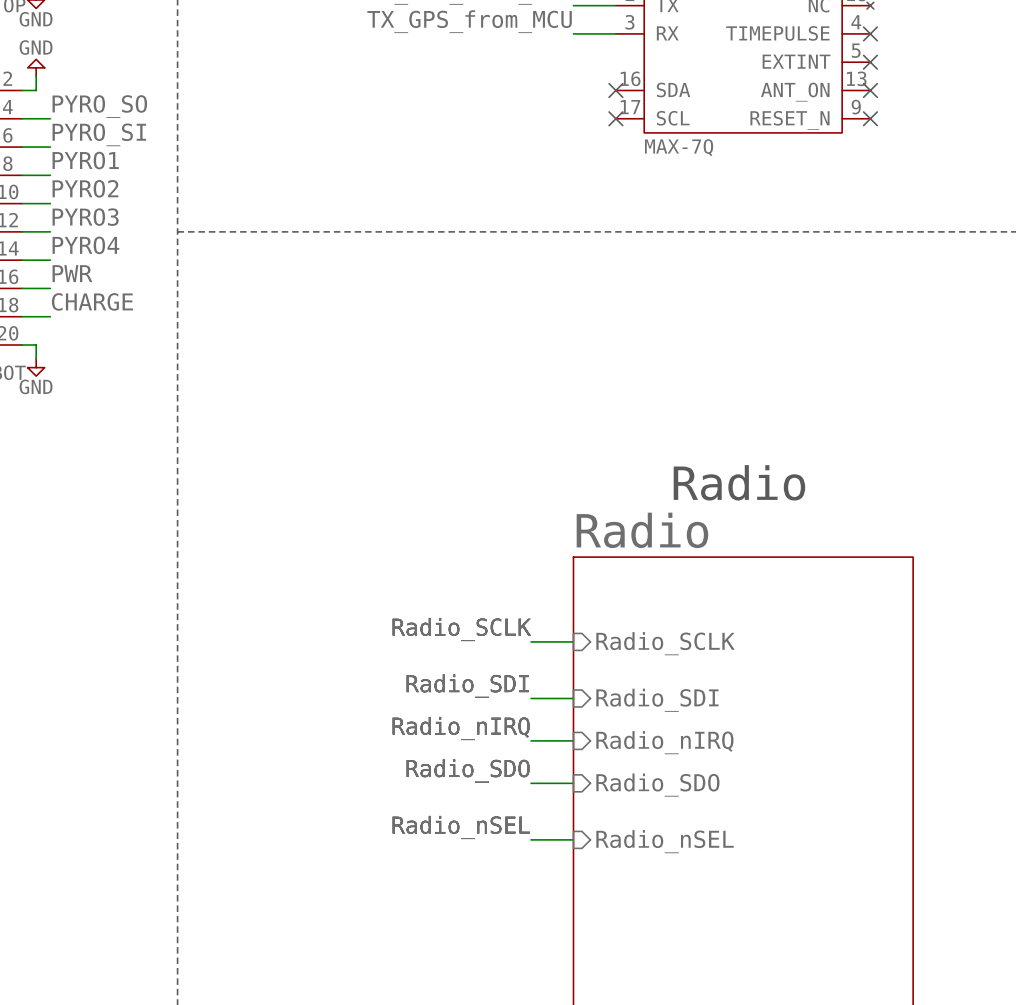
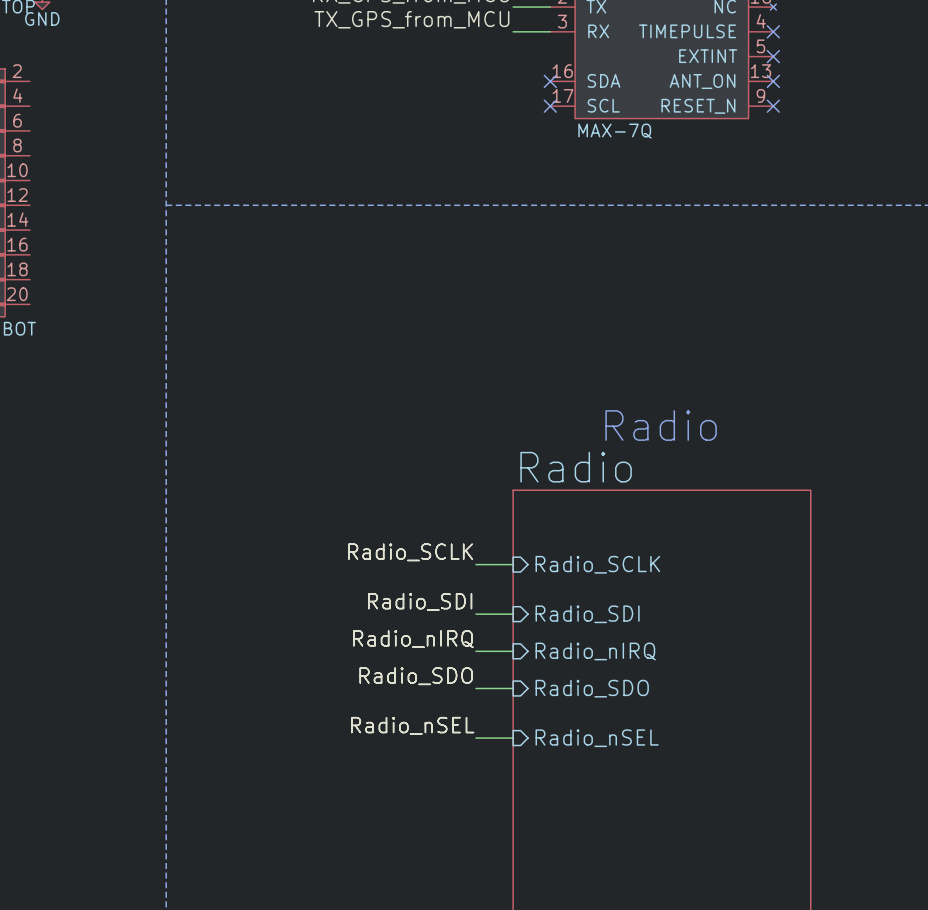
power symbol: GND (36, 67) -> none
wire: (36, 76) (36, 90) (22, 90) -> none
label: PYRO_SO (99, 106) -> none
wire: (22, 118) (50, 118) -> none
label: PYRO_SI (99, 134) -> none
wire: (22, 147) (50, 147) -> none
label: PYRO1 (85, 160) -> none
wire: (22, 175) (50, 175) -> none
label: PYRO2 (85, 188) -> none
wire: (22, 203) (50, 203) -> none
label: PYRO3 (85, 217) -> none
wire: (22, 231) (50, 231) -> none
label: PYRO4 (85, 245) -> none
wire: (22, 260) (50, 260) -> none
label: PWR (72, 273) -> none
wire: (22, 288) (50, 288) -> none
label: CHARGE (92, 301) -> none
wire: (22, 316) (50, 316) -> none
wire: (22, 345) (36, 345) (36, 359) -> none
power symbol: GND (36, 367) -> none

